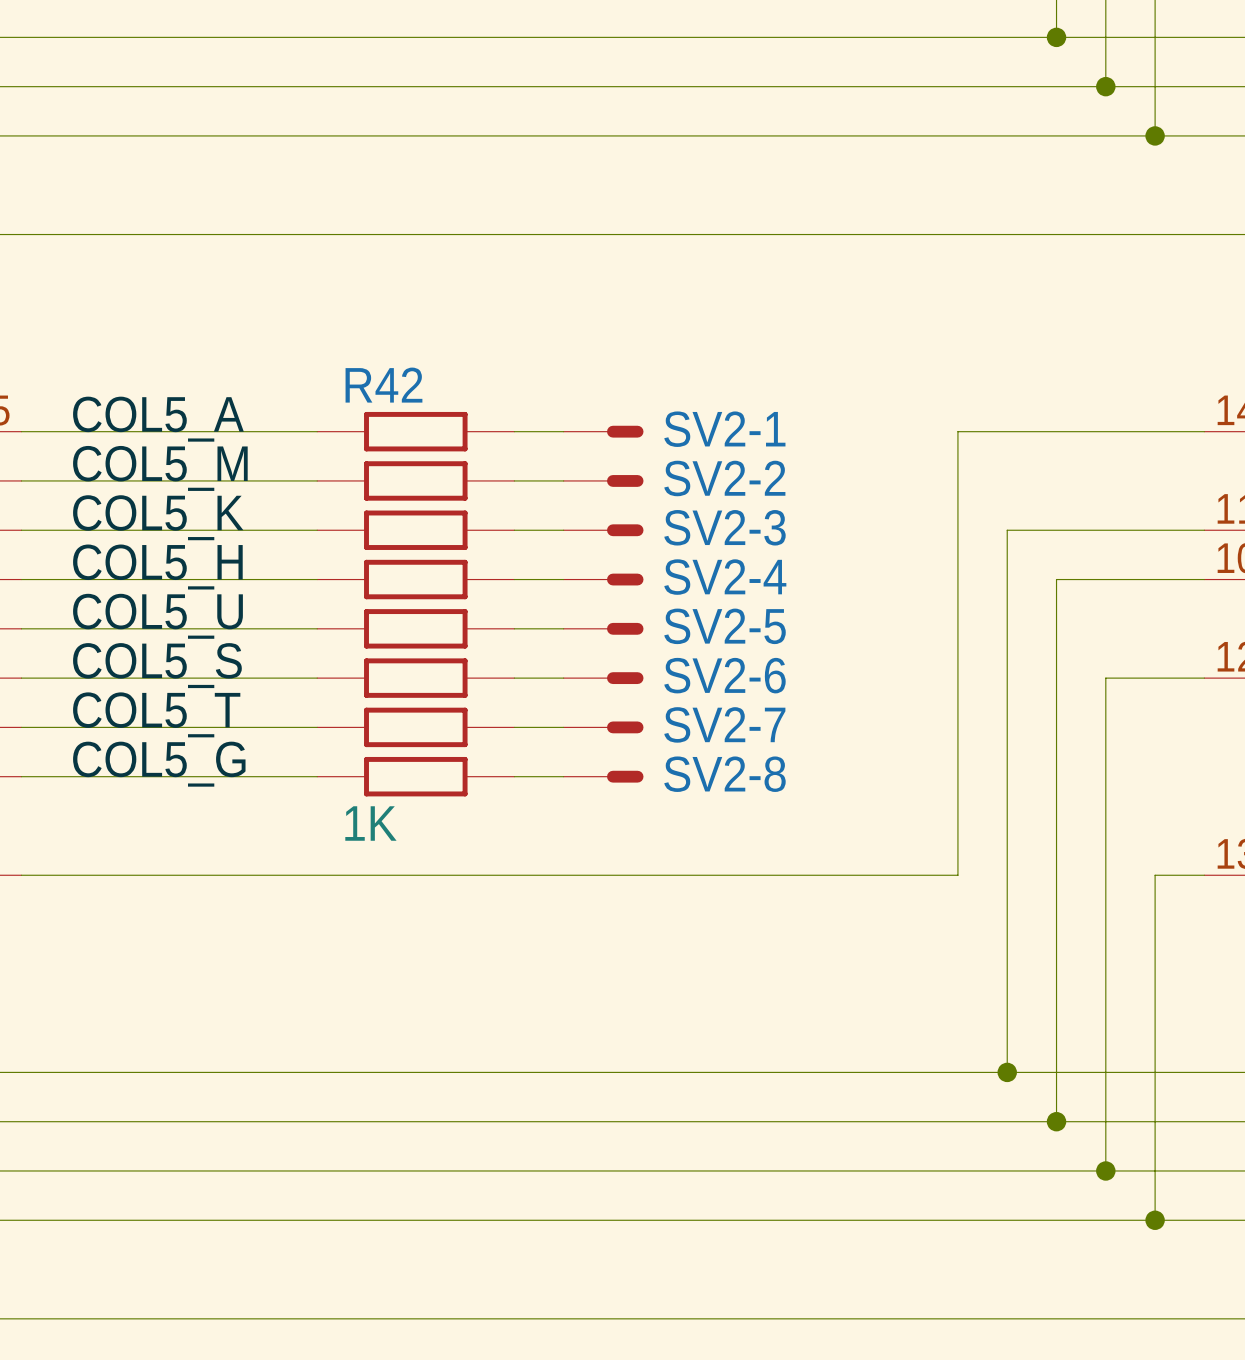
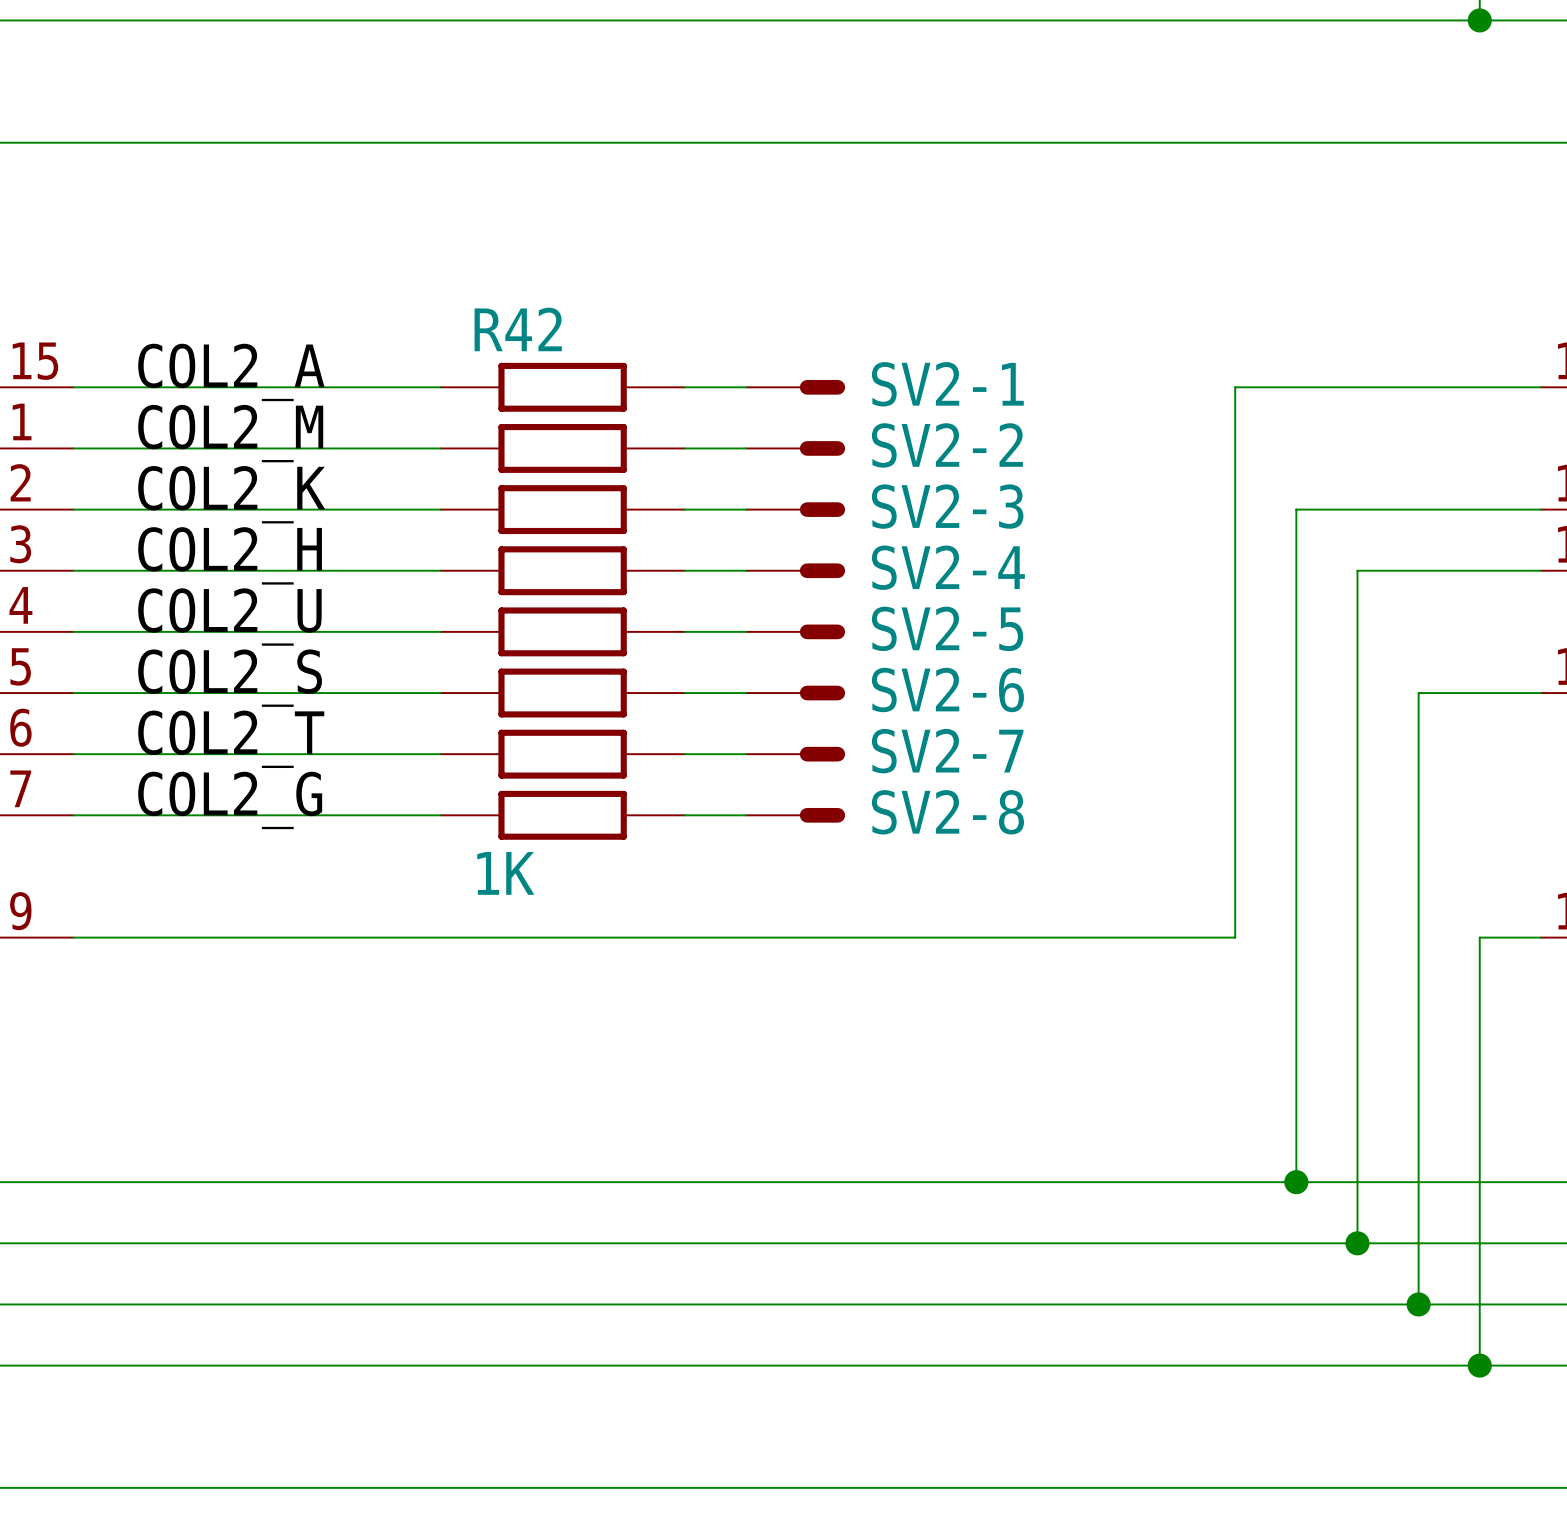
label: COL5_A (158, 419) -> COL2_A (231, 372)
label: COL5_M (160, 468) -> COL2_M (230, 433)
label: COL5_K (158, 517) -> COL2_K (231, 494)
label: COL5_H (157, 567) -> COL2_H (230, 555)
label: COL5_U (157, 616) -> COL2_U (229, 617)
label: COL5_S (157, 665) -> COL2_S (230, 678)
label: COL5_T (156, 714) -> COL2_T (231, 739)
label: COL5_G (159, 764) -> COL2_G (230, 800)

